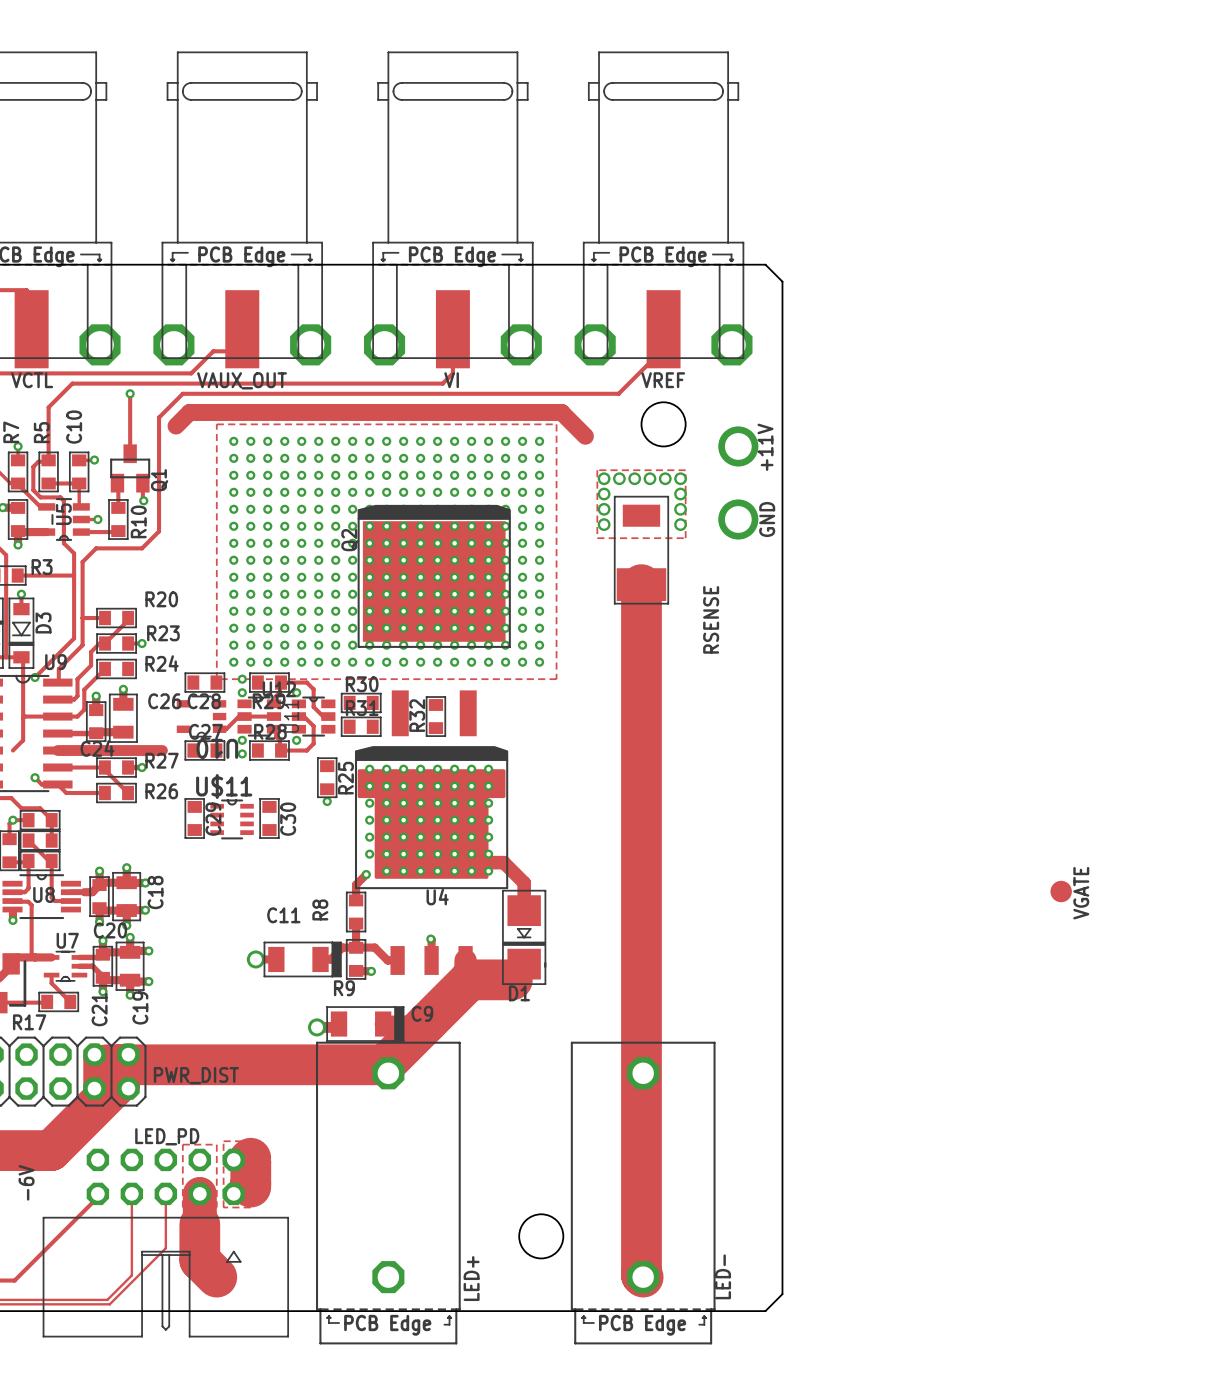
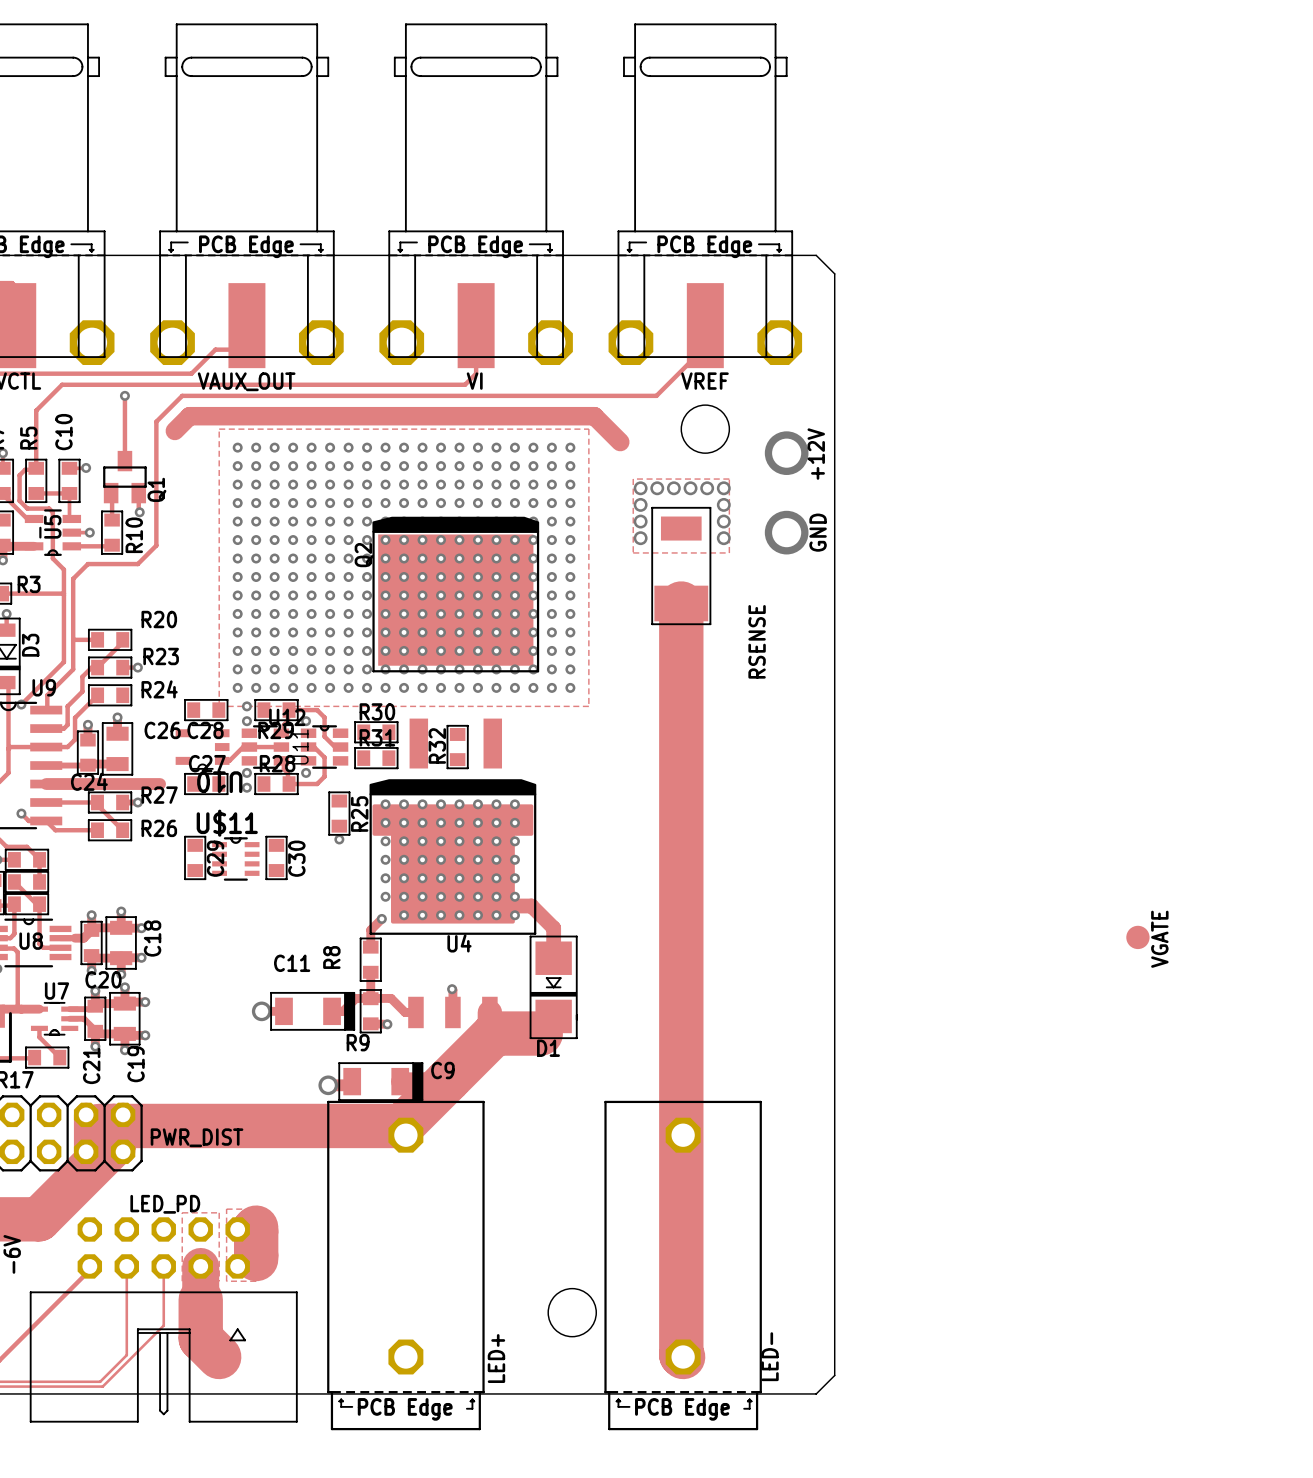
text: +11V (765, 447) -> +12V (816, 454)

